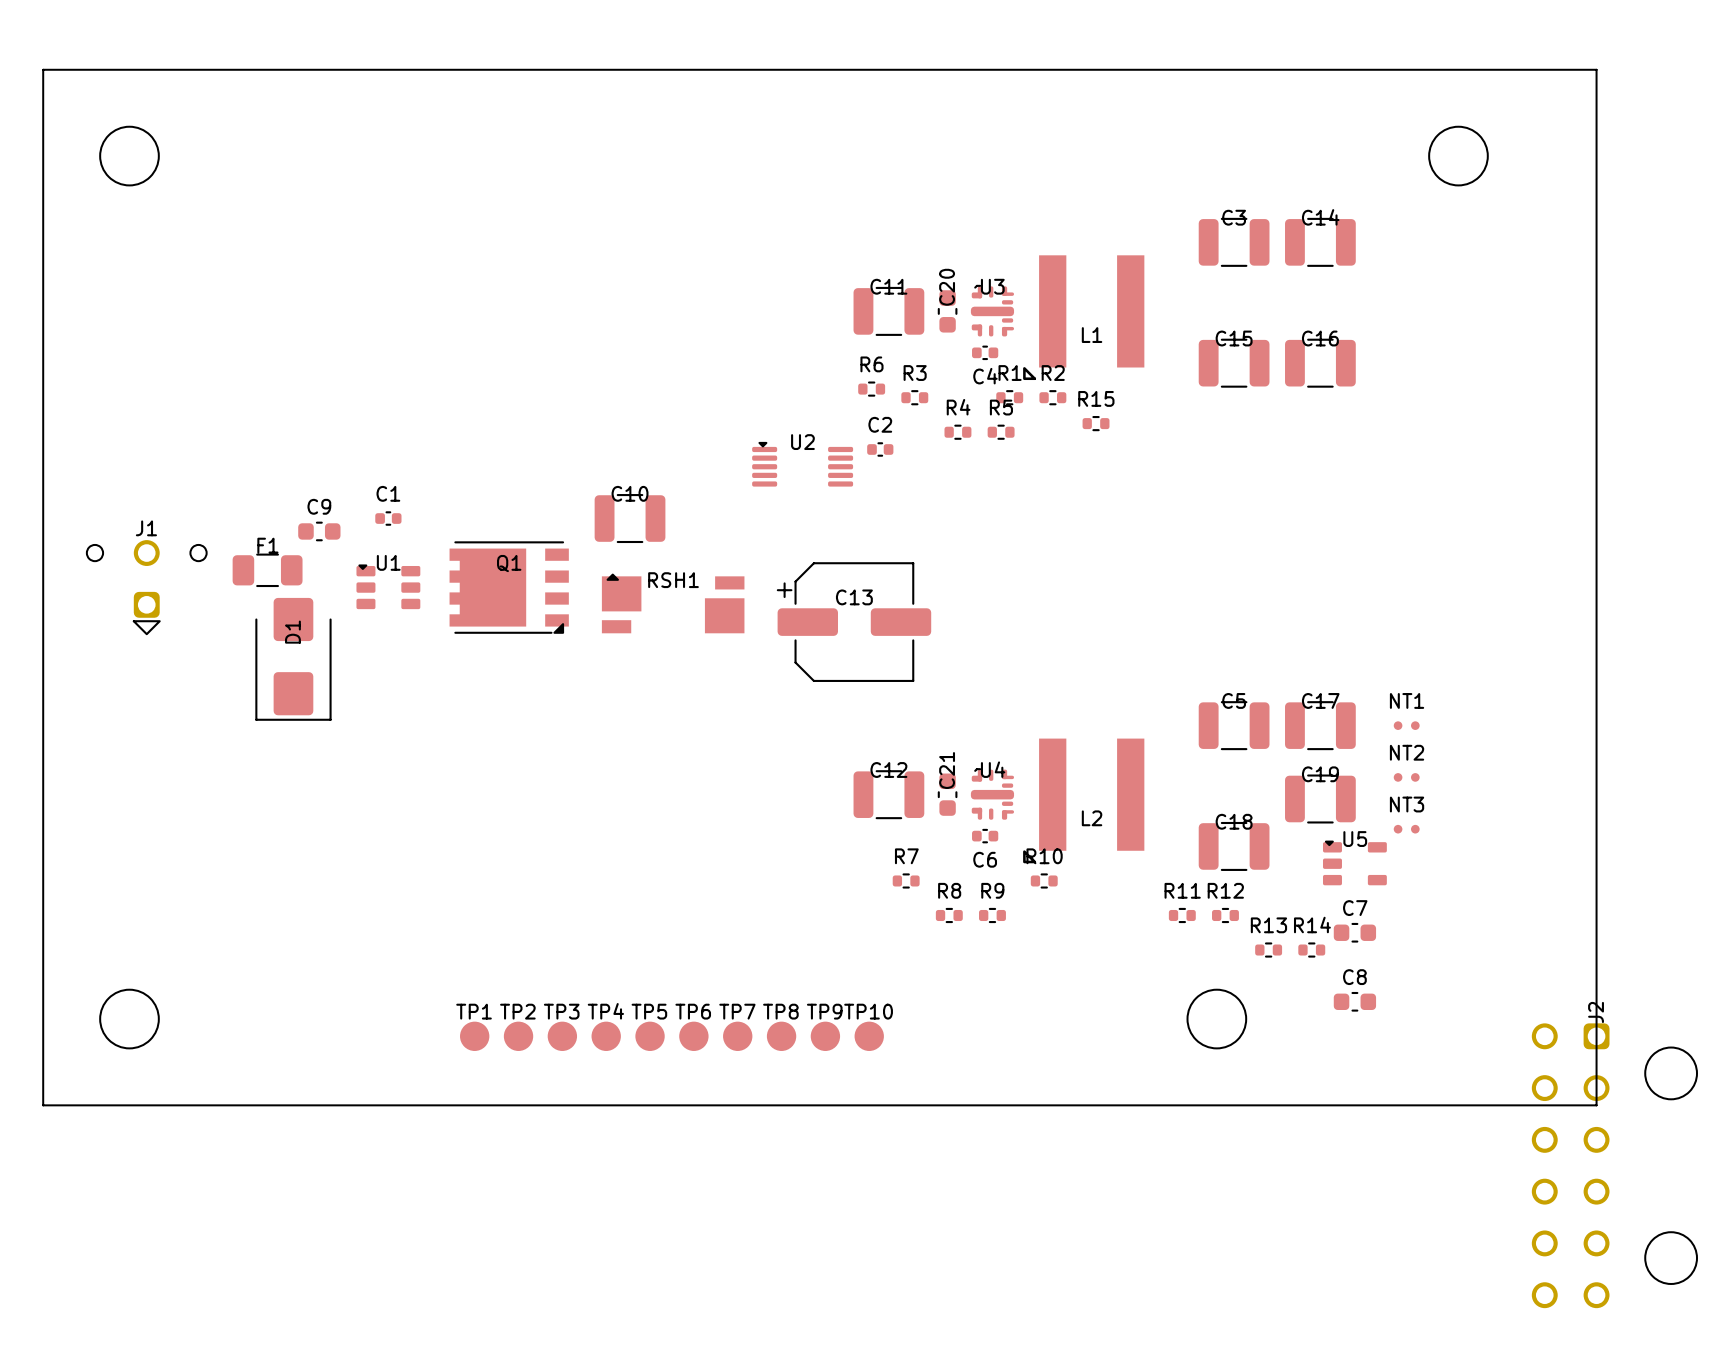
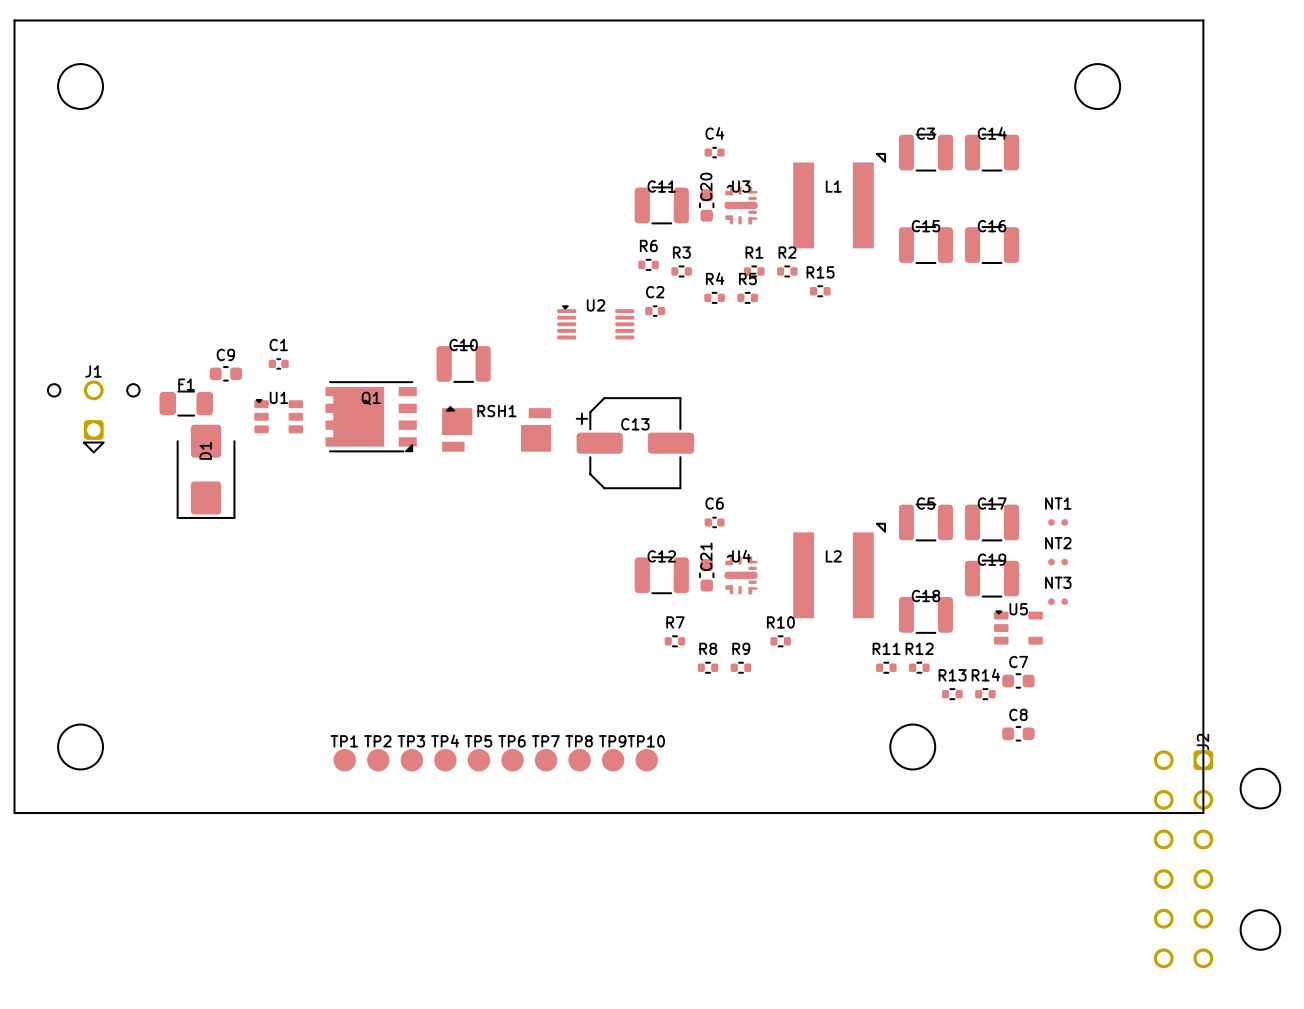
L1 rotation: 0° (1083, 317) -> 180° (839, 200)
C4 position: (985, 352) -> (714, 152)
C4 name position: C4 (985, 376) -> C4 (714, 133)
L2 rotation: 0° (1083, 800) -> 180° (839, 570)
C6 position: (985, 836) -> (714, 522)
C6 name position: C6 (985, 859) -> C6 (714, 503)

